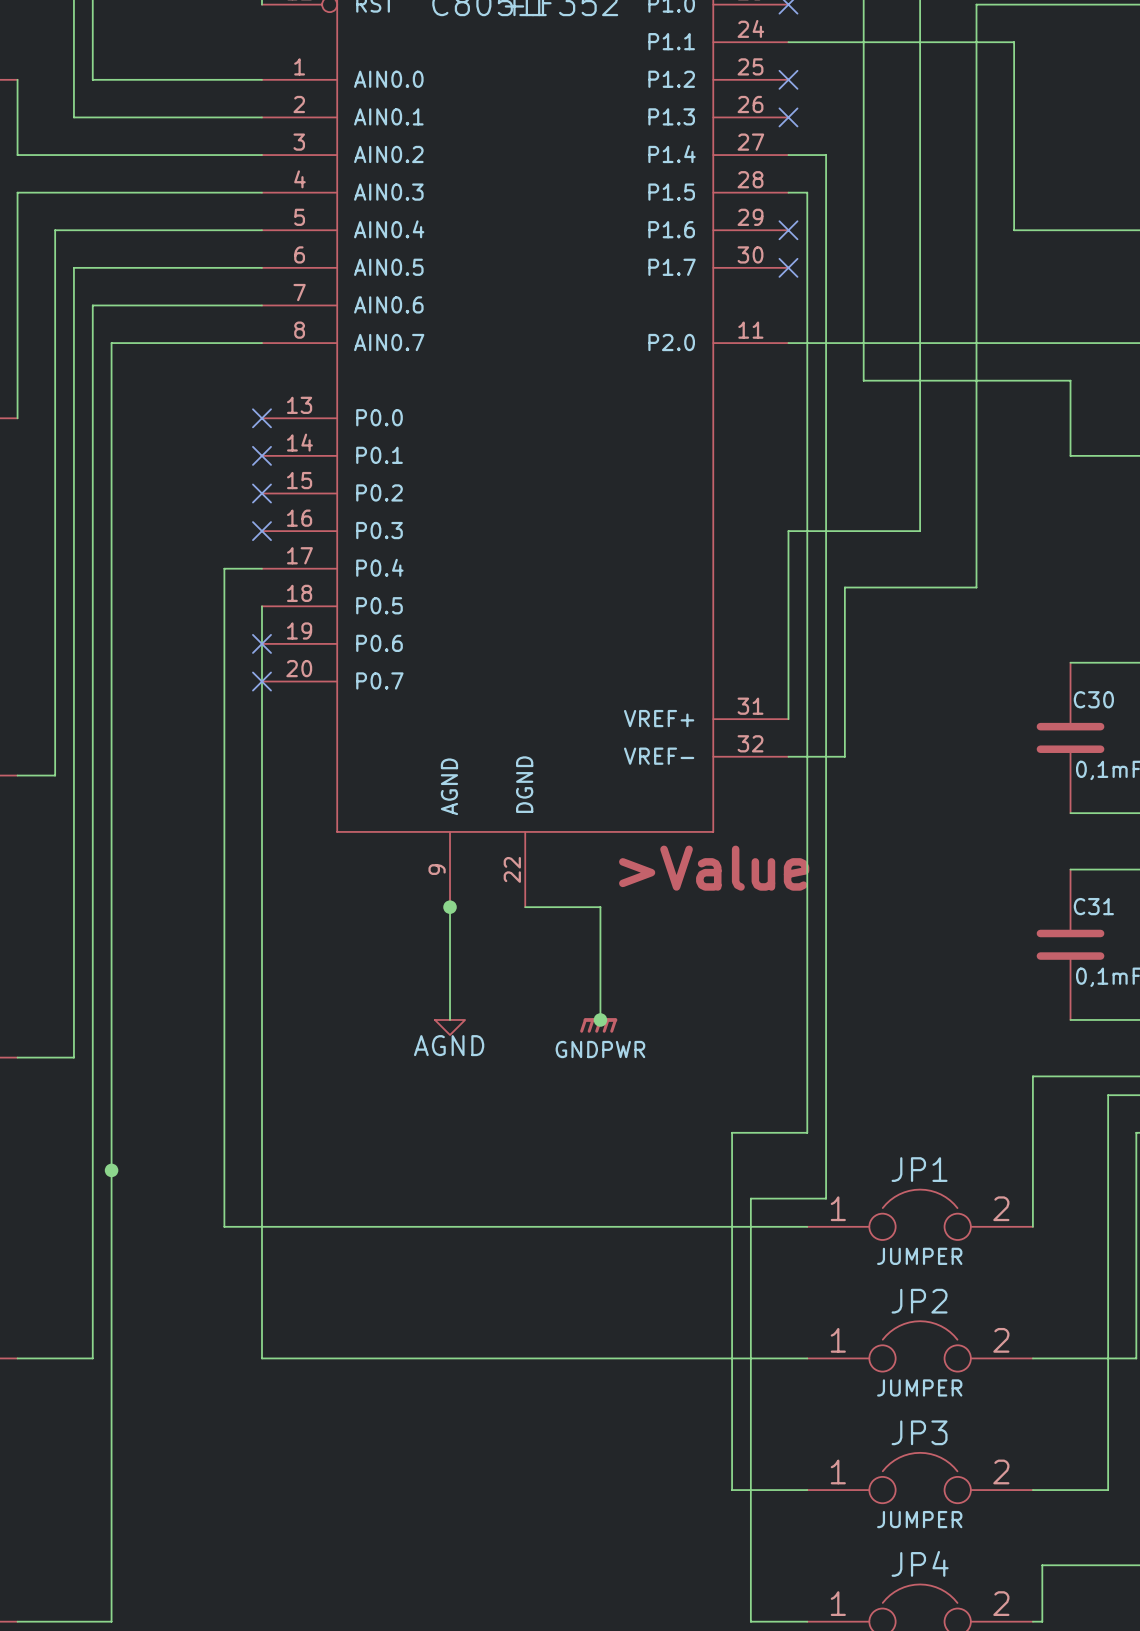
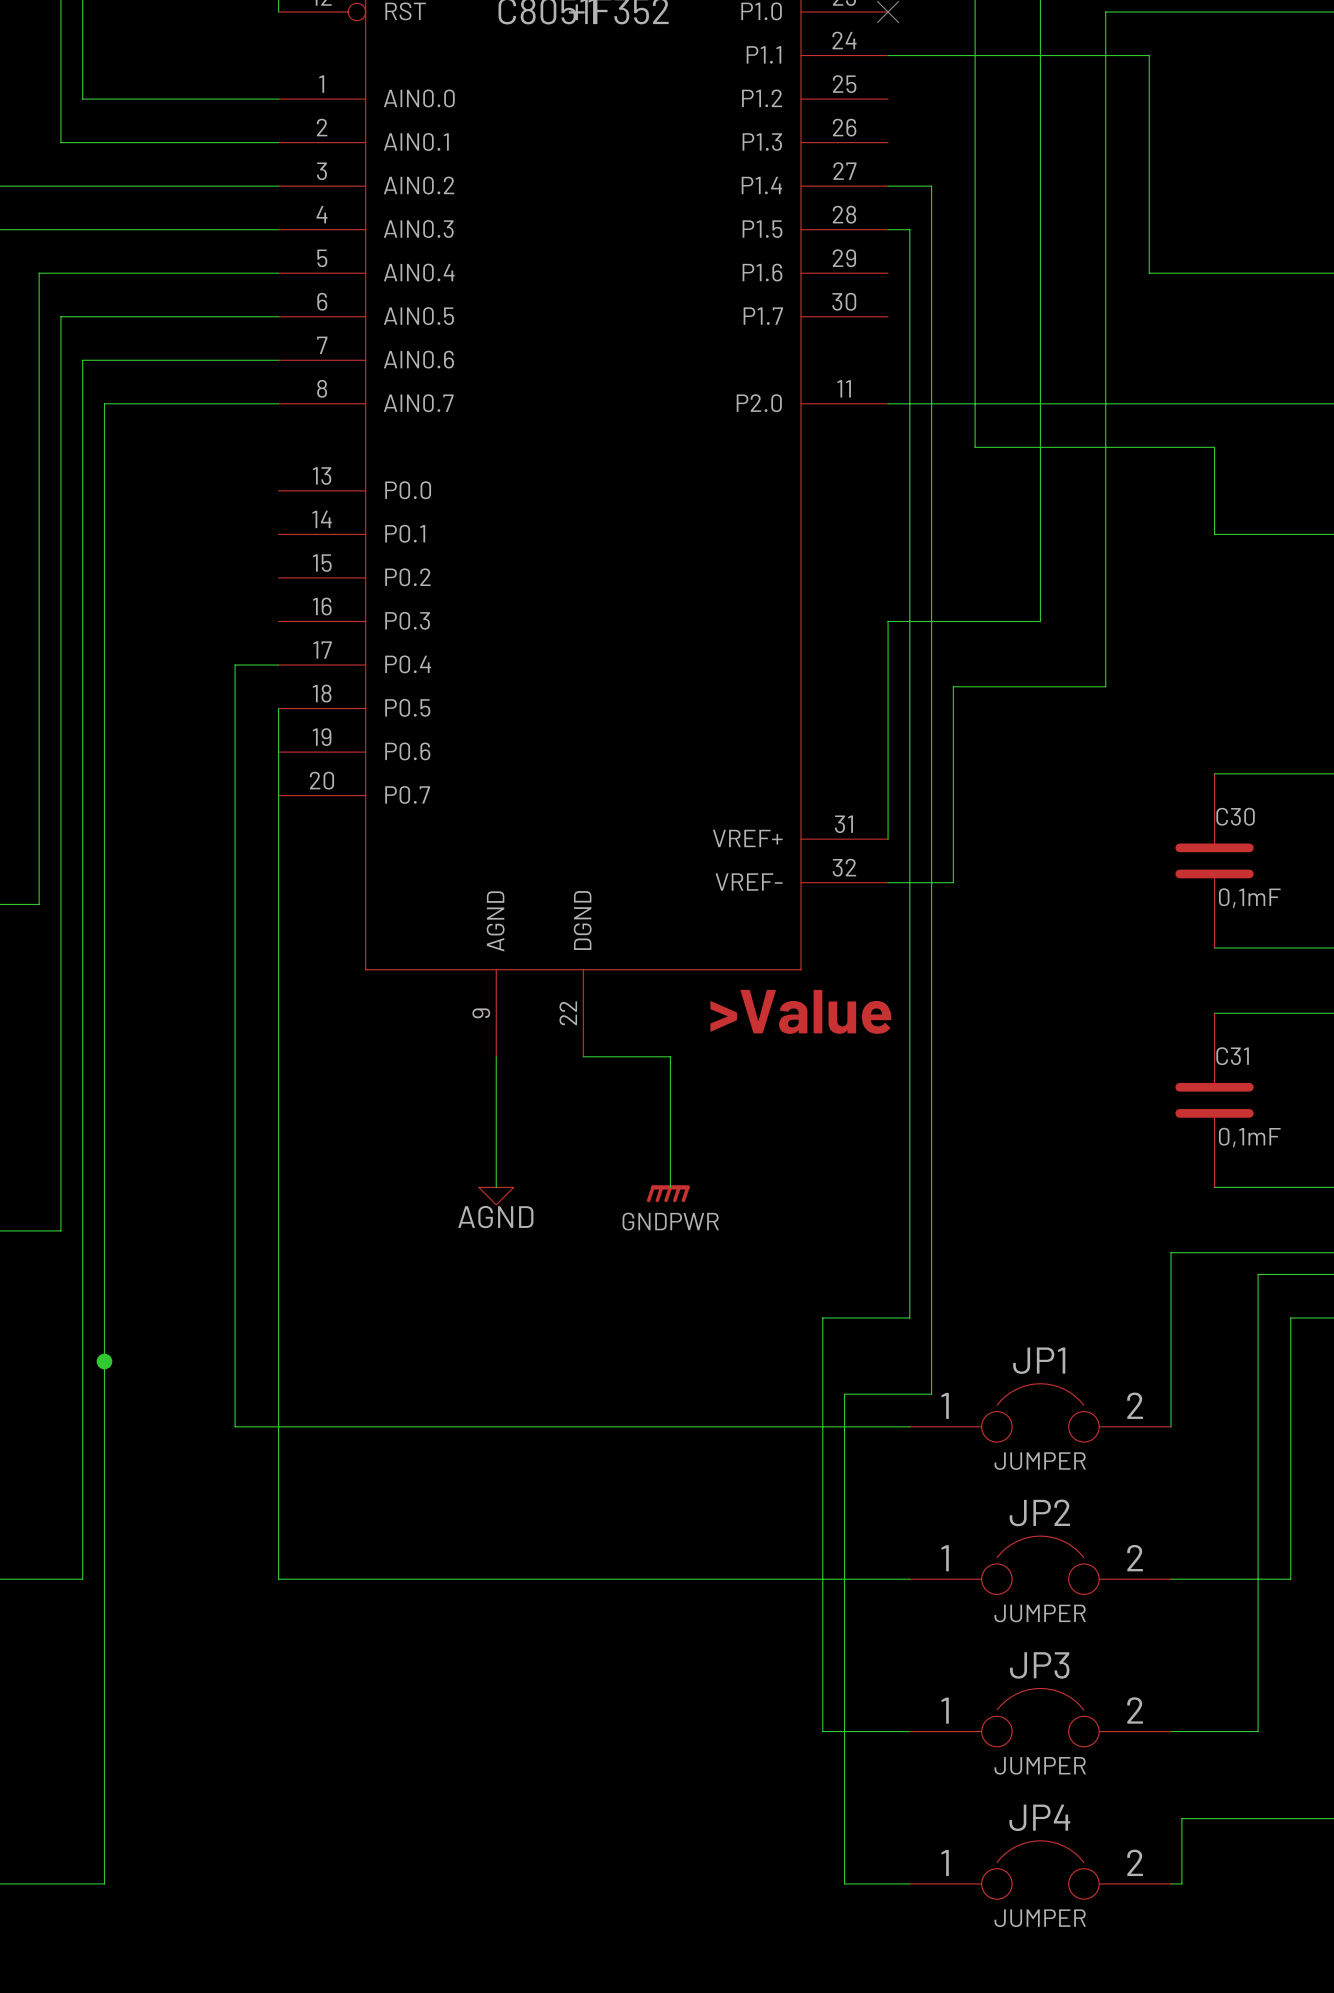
no-connect mark: (788, 79) -> none
no-connect mark: (788, 117) -> none
no-connect mark: (788, 230) -> none
no-connect mark: (788, 267) -> none
no-connect mark: (261, 418) -> none
no-connect mark: (261, 455) -> none
no-connect mark: (261, 493) -> none
no-connect mark: (261, 531) -> none
no-connect mark: (261, 643) -> none
no-connect mark: (261, 681) -> none
junction: (450, 907) -> none
junction: (600, 1019) -> none

